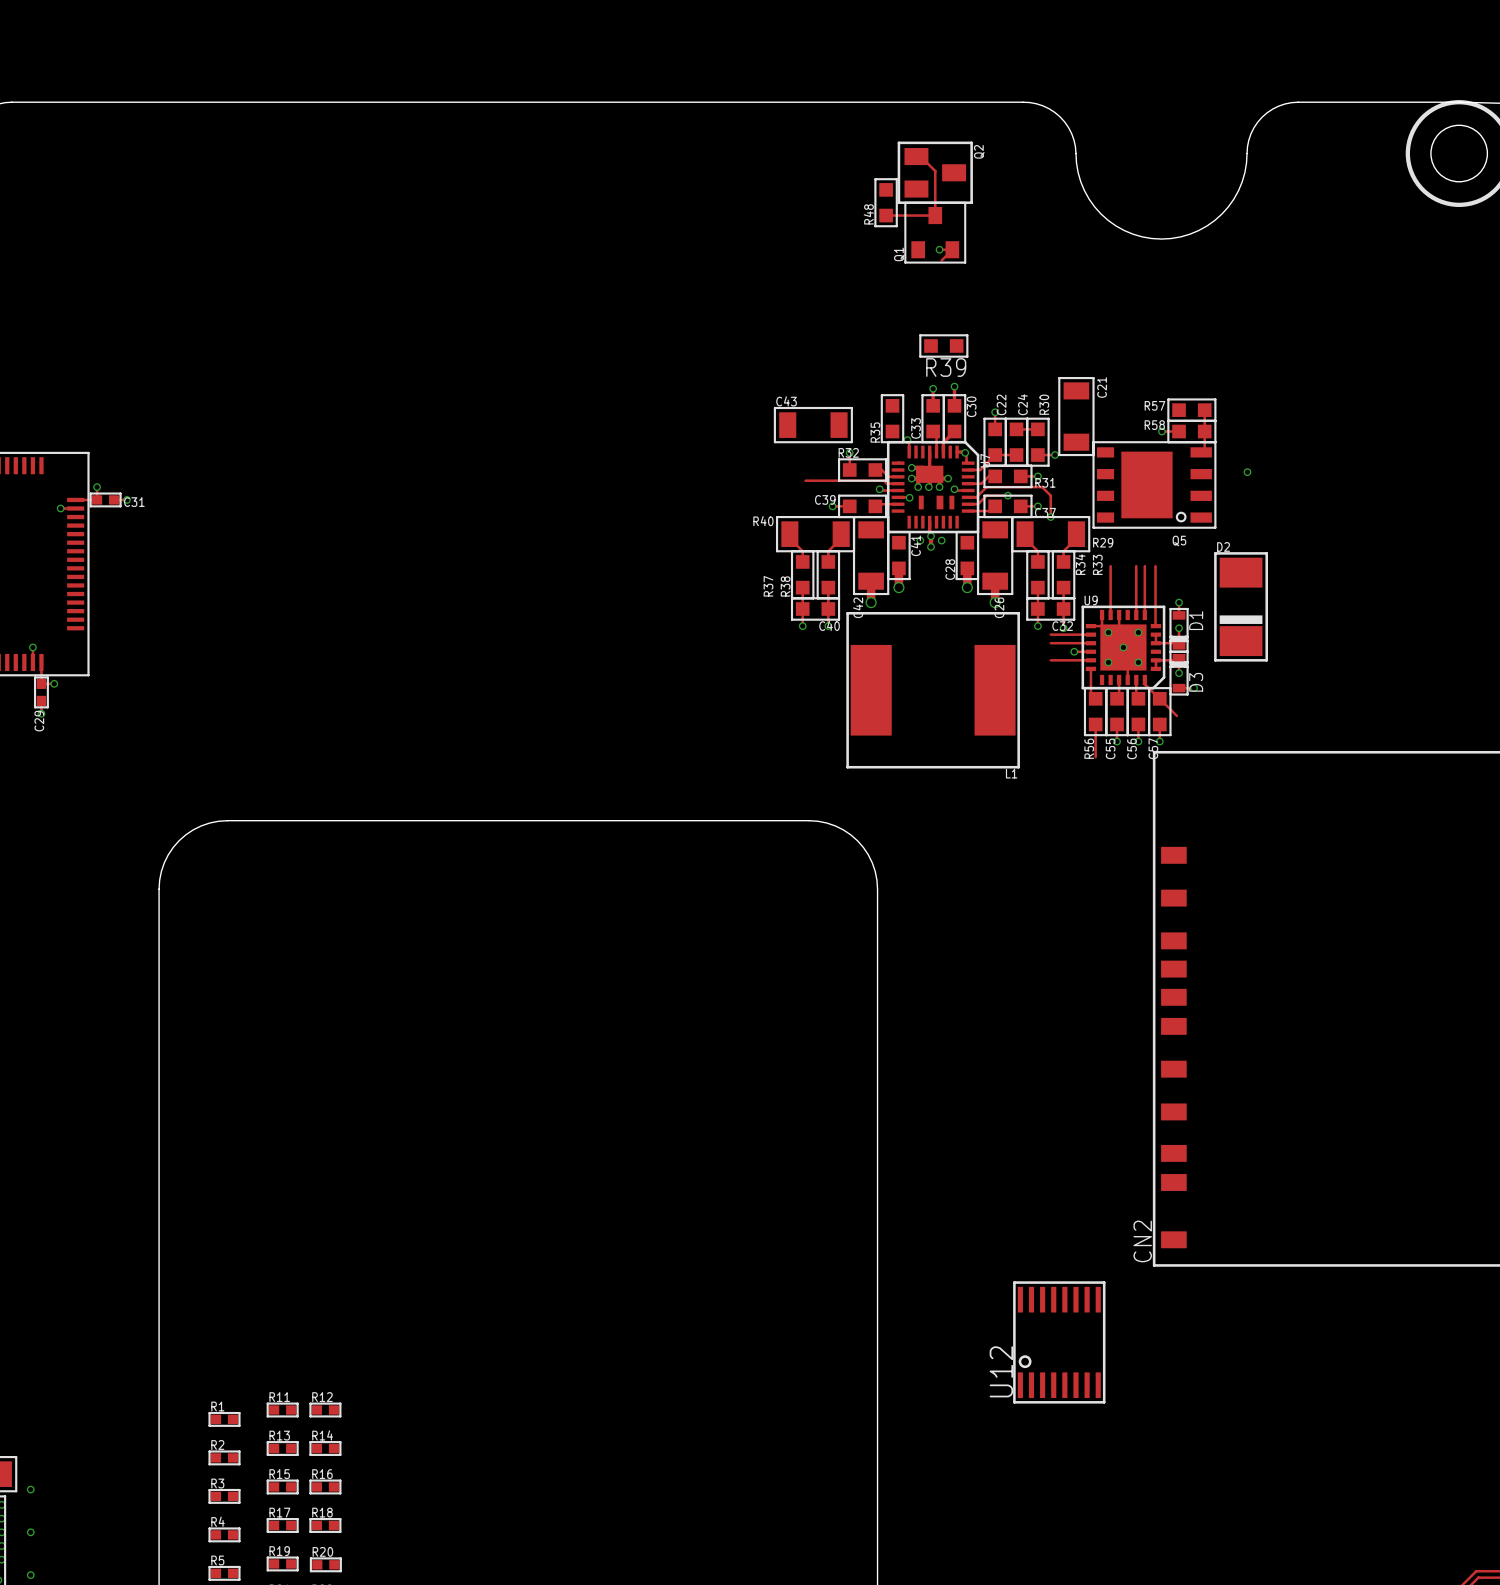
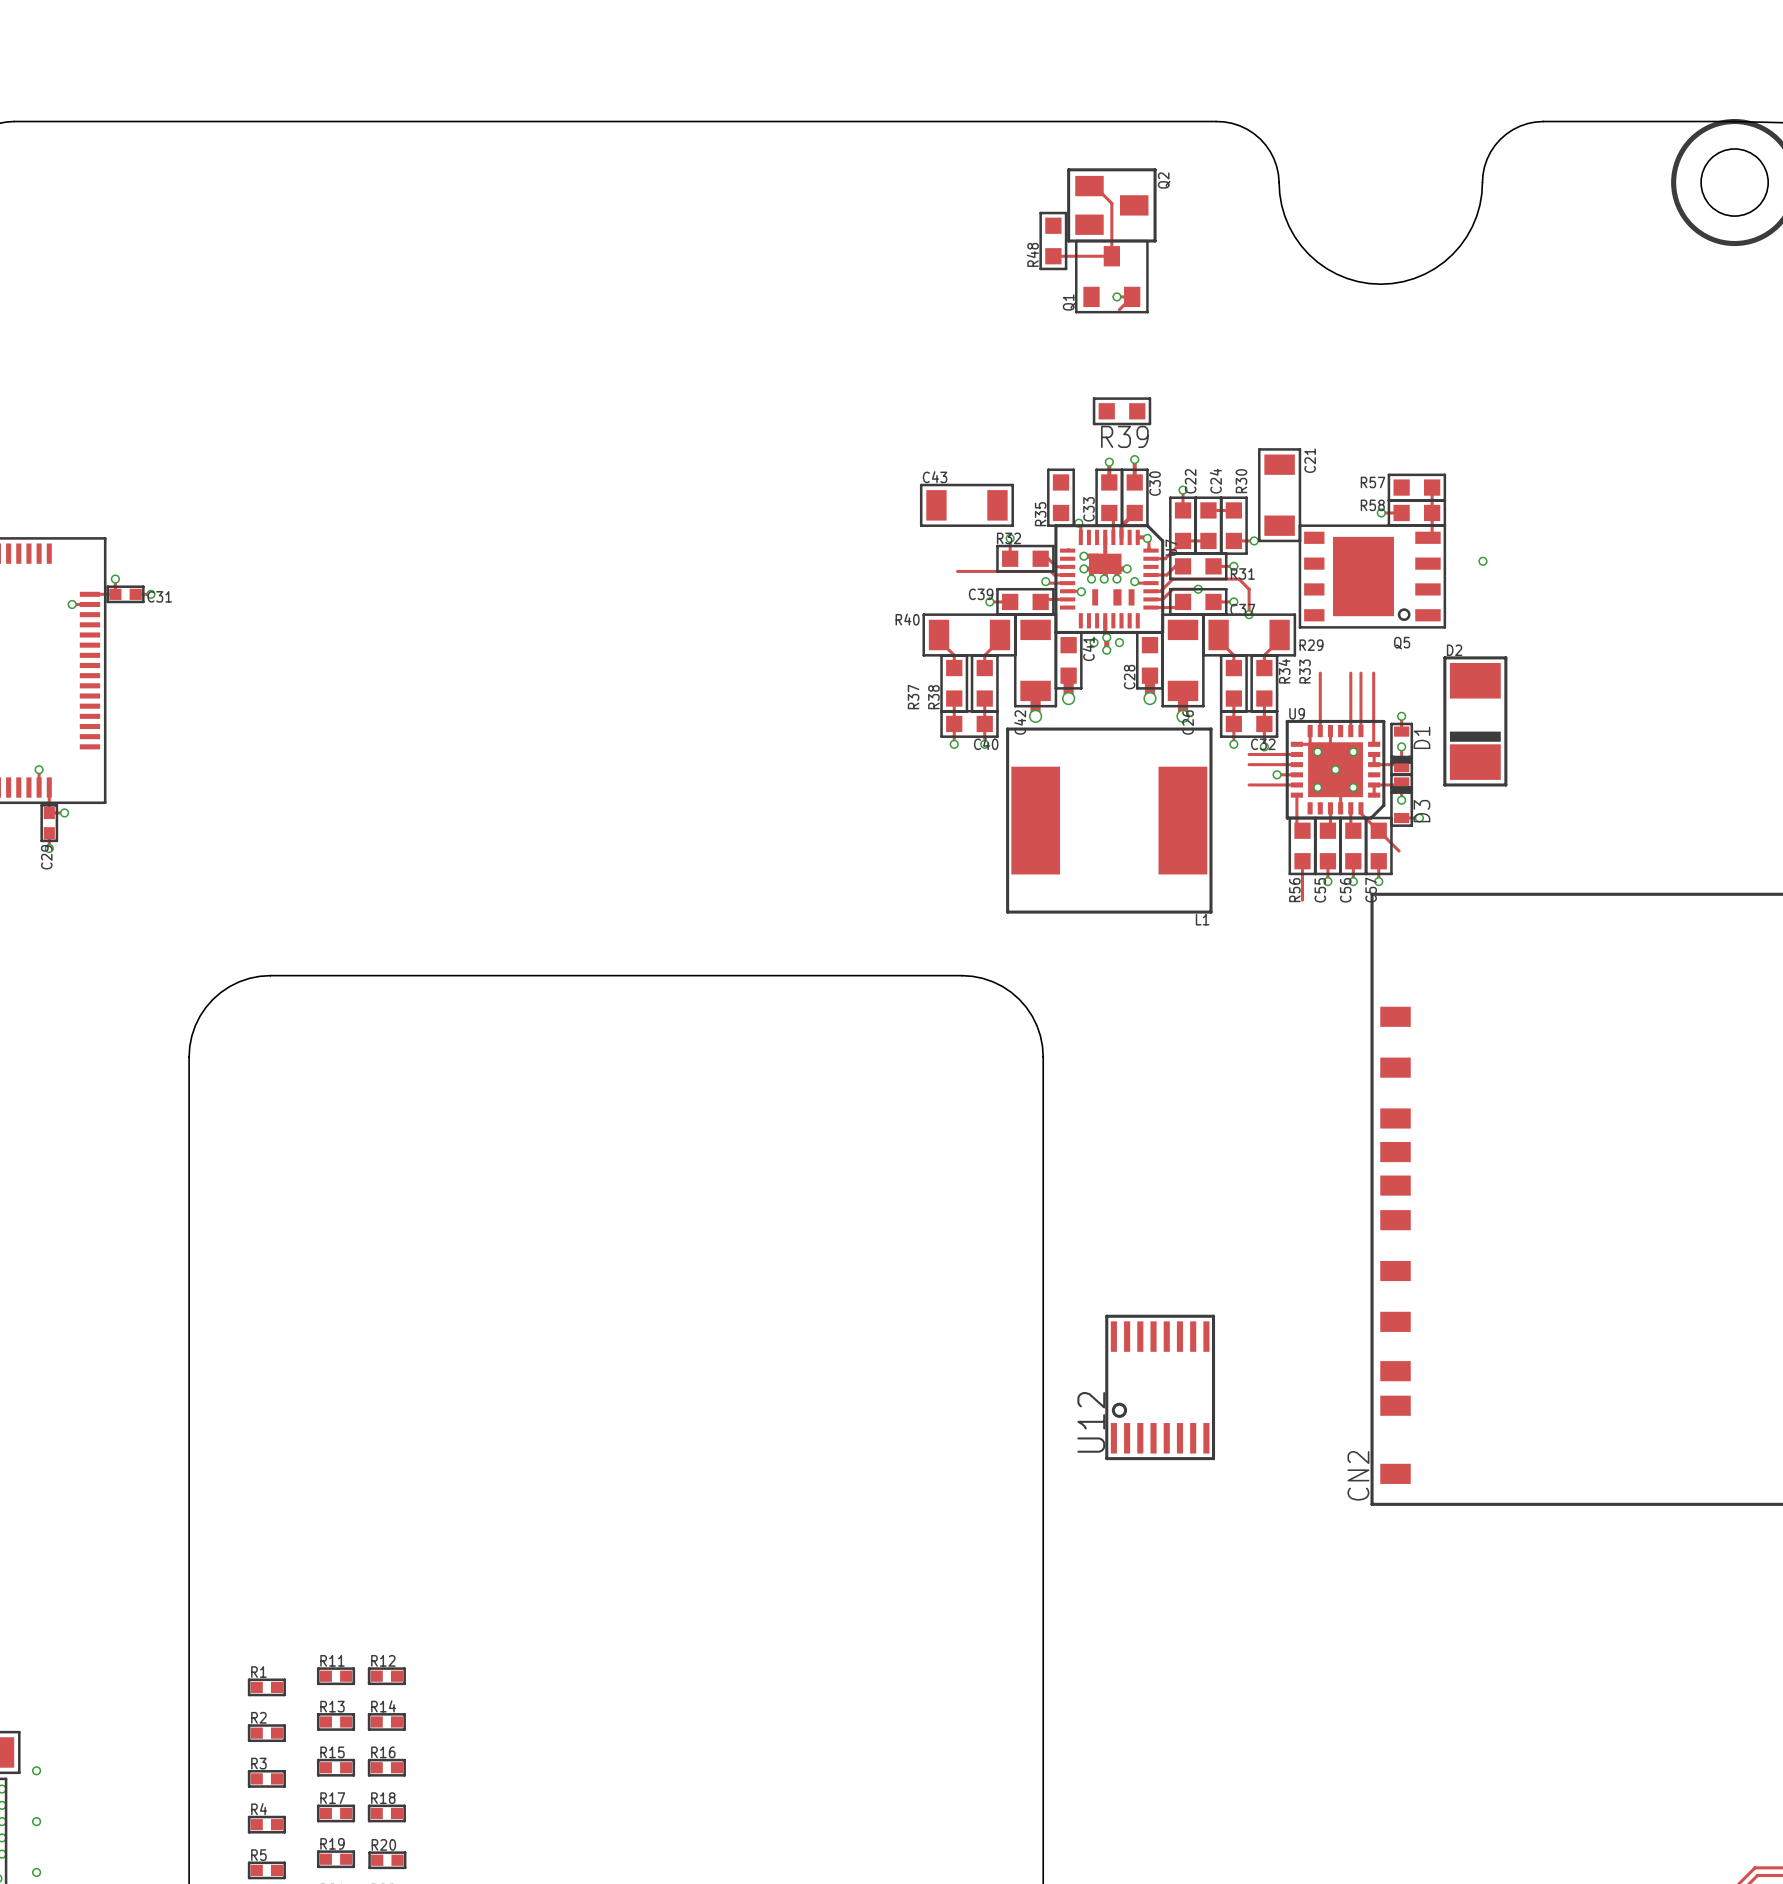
U12 position: (1059, 1342) -> (1160, 1387)

